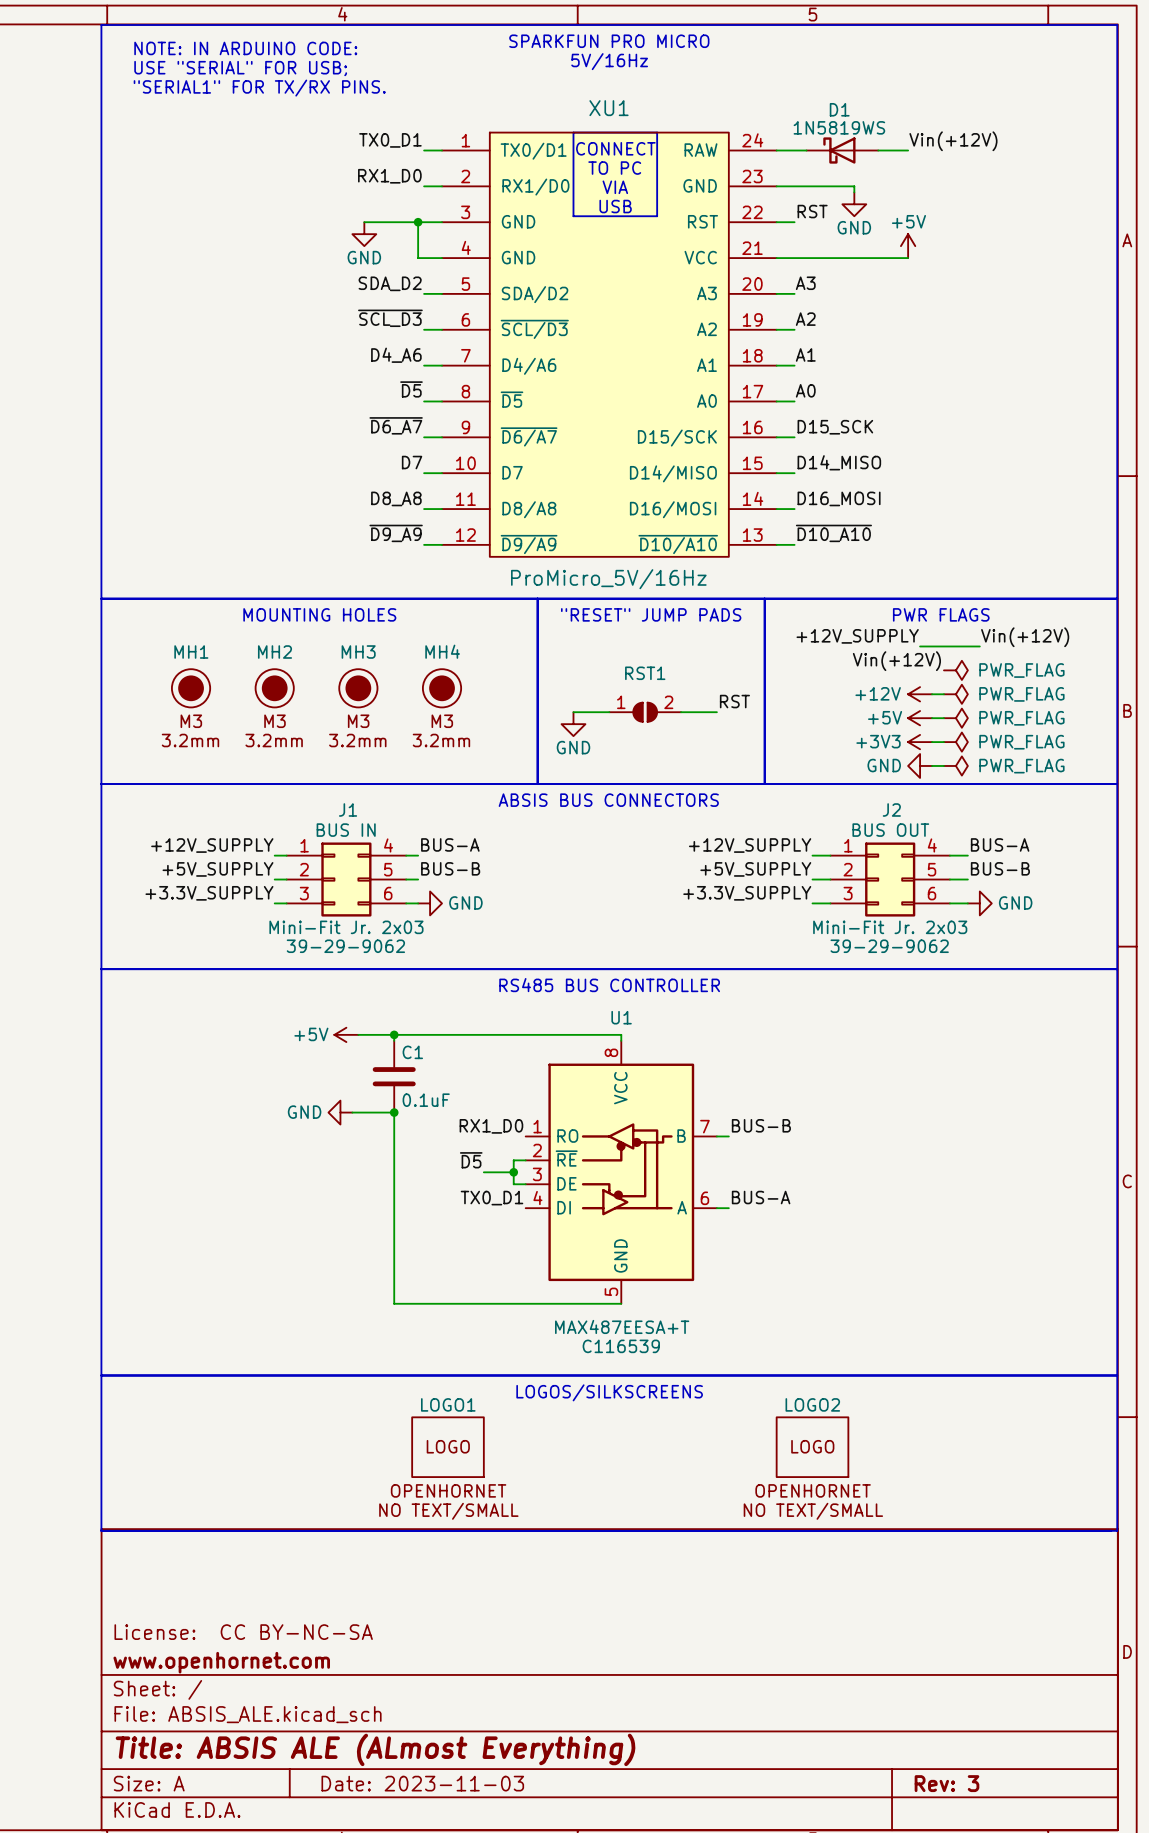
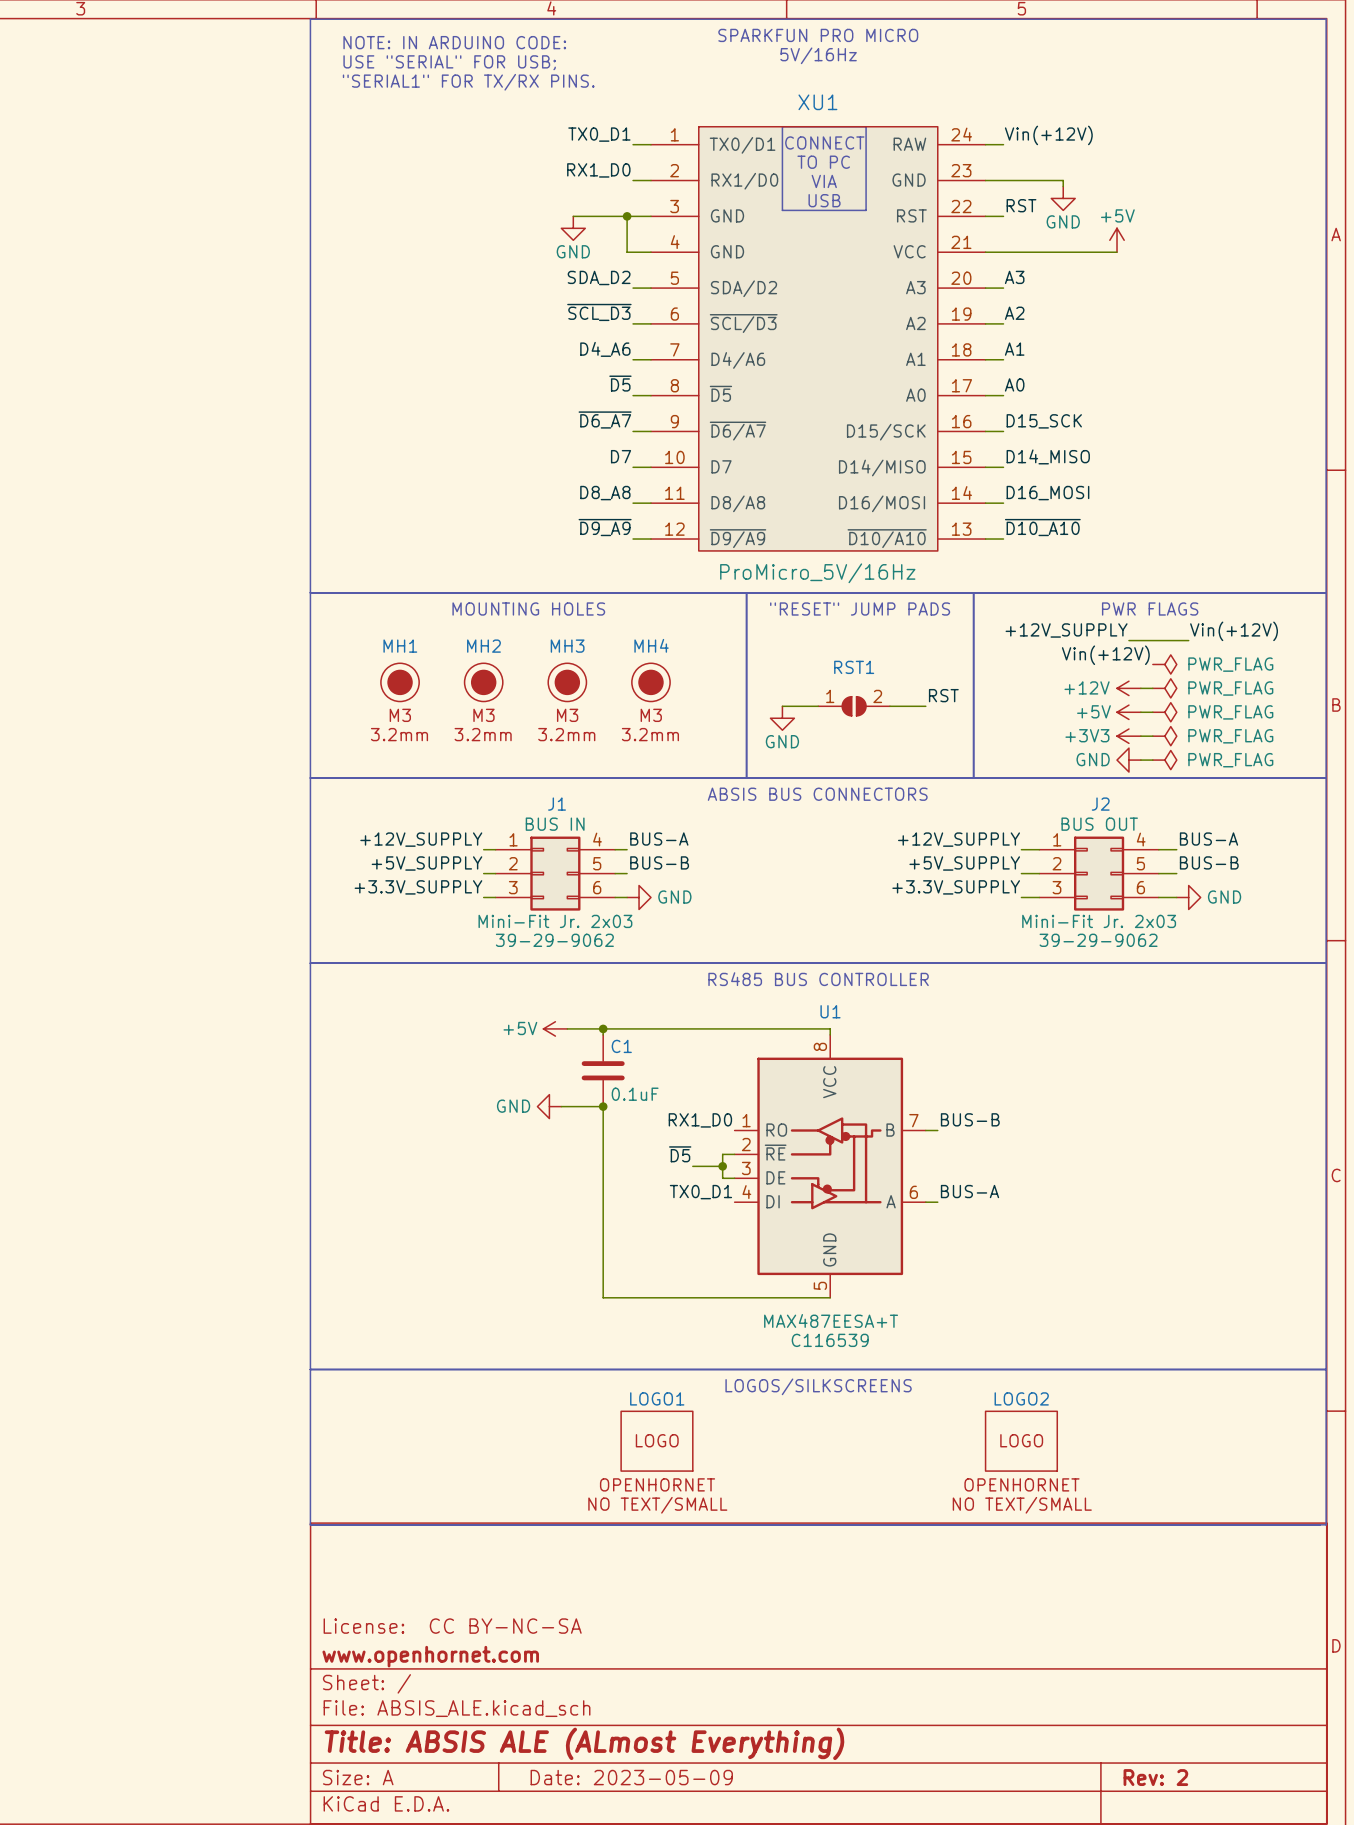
label position: Vin(+12V) (953, 141) -> Vin(+12V) (1048, 135)
wire: (794, 150) (806, 150) -> none
D1: 1N5819WS (842, 150) -> none
wire: (878, 150) (908, 150) -> none
title block: Date: 2023-11-03 (422, 1783) -> Date: 2023-05-09 (631, 1777)
title block: Rev: 3 (946, 1783) -> Rev: 2 (1155, 1777)

